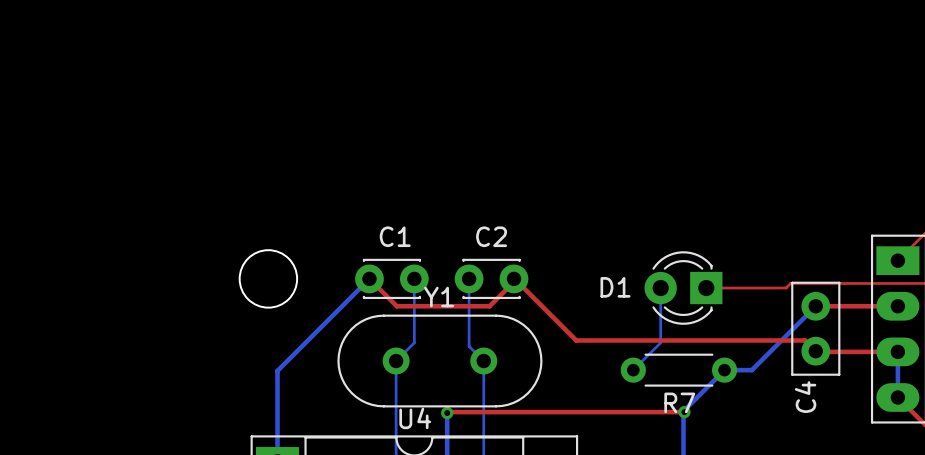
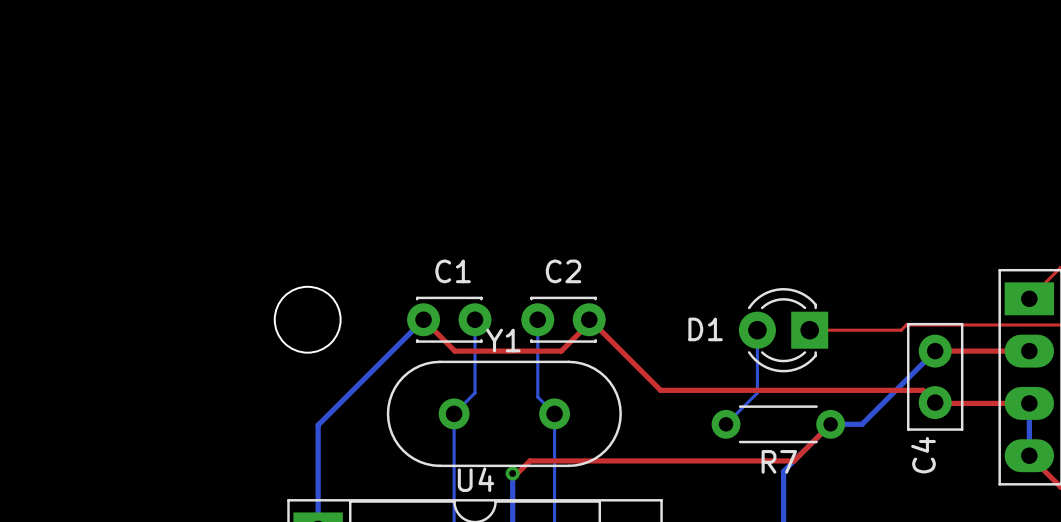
top track: none -> (830, 424) (794, 460) (529, 460) (516, 474)
top track: (684, 412) (447, 413) -> none
via: (684, 412) -> none

